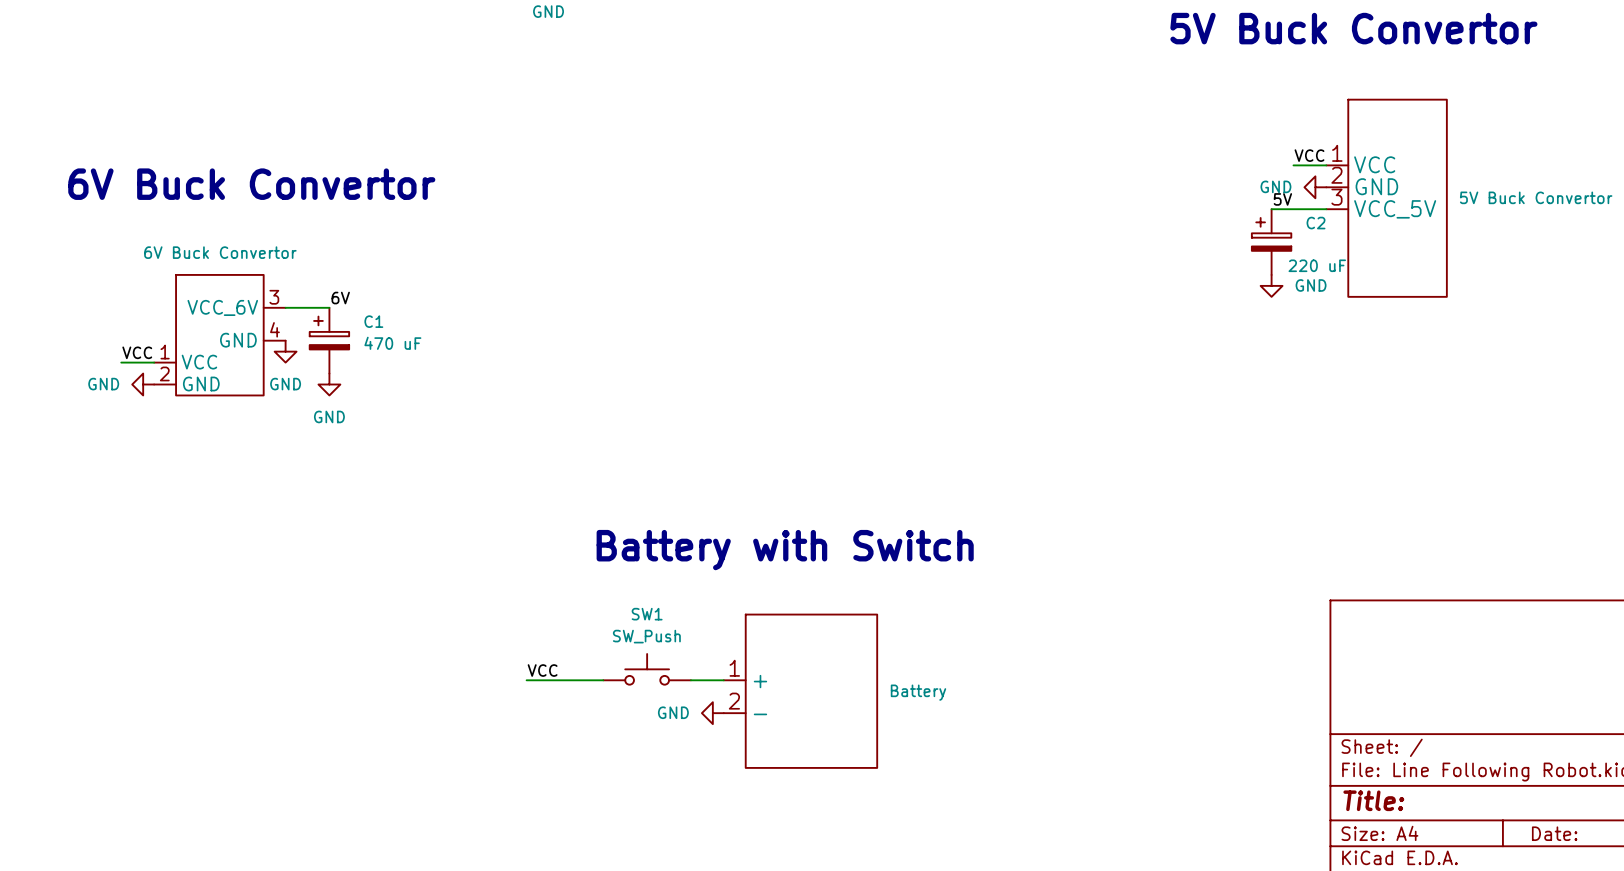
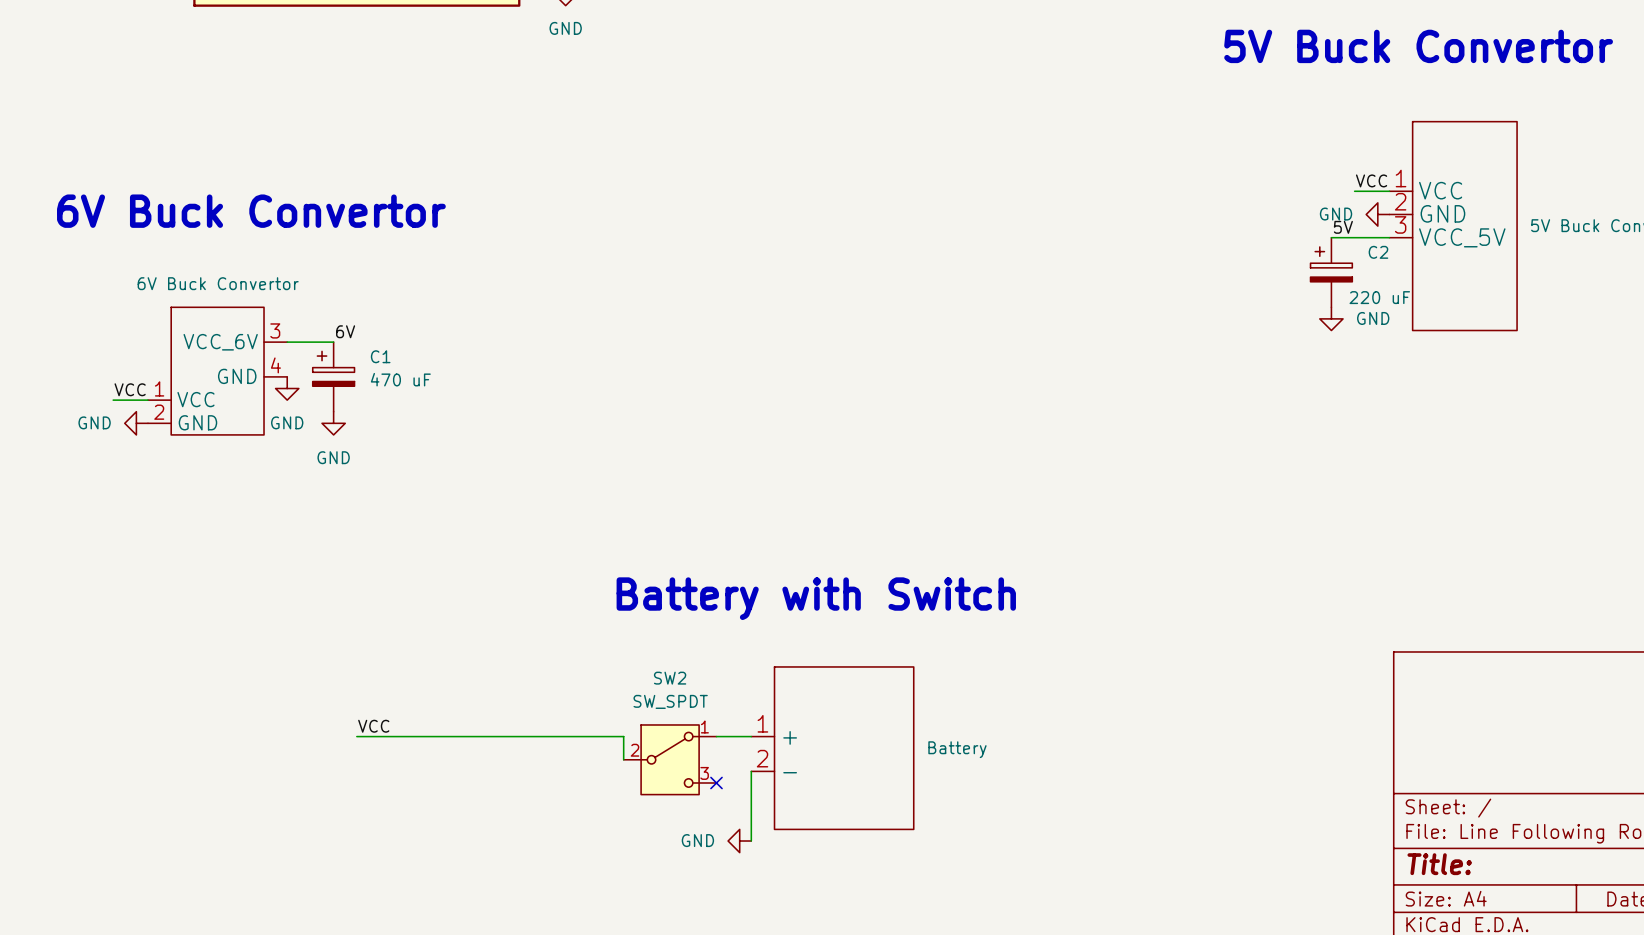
SW1: SW_Push (647, 669) -> none
label position: VCC (542, 670) -> VCC (373, 726)
wire: none -> (356, 736) (542, 736)
wire: none -> (623, 736) (623, 759)
SW2: none -> SW_SPDT (670, 759)
power symbol position: GND (712, 713) -> GND (739, 841)
wire: none -> (751, 771) (751, 841)
no-connect mark: none -> (716, 782)

